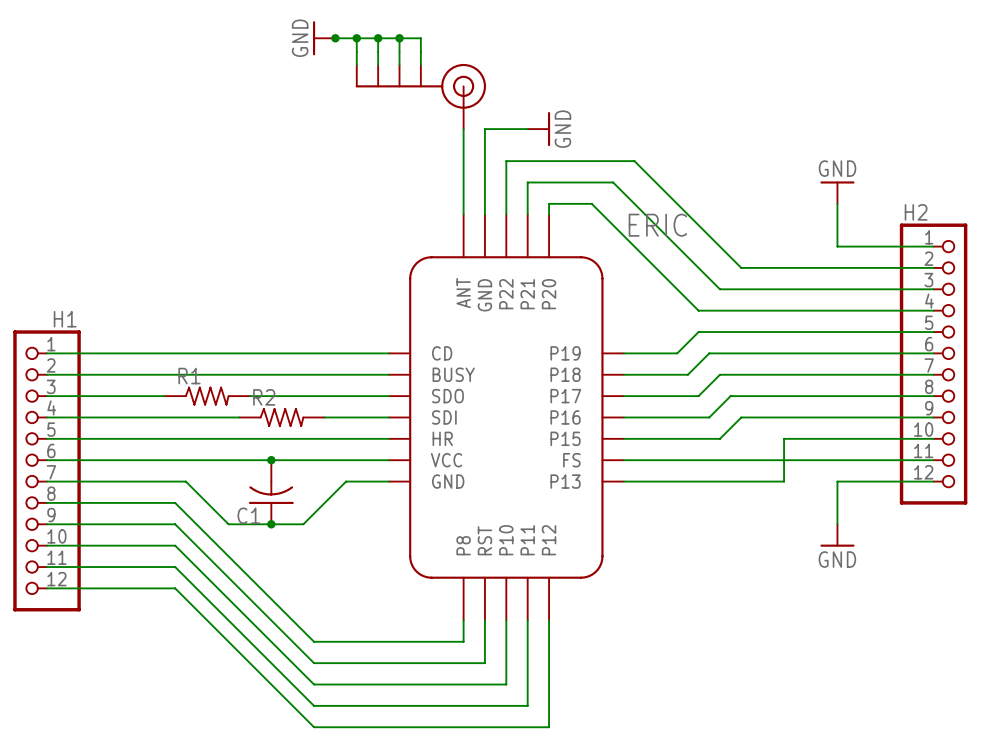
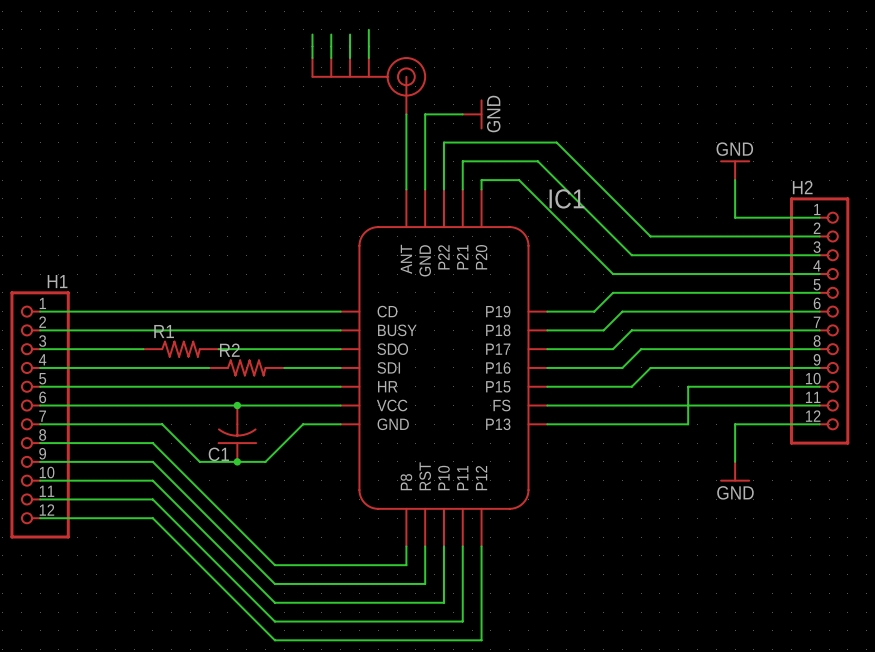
power symbol: GND (324, 38) -> none
wire: (334, 38) (420, 38) -> (368, 29) (368, 34)
junction: (335, 38) -> none
junction: (356, 38) -> none
junction: (378, 38) -> none
junction: (399, 38) -> none
ERIC name: ERIC (657, 225) -> IC1 (566, 198)

